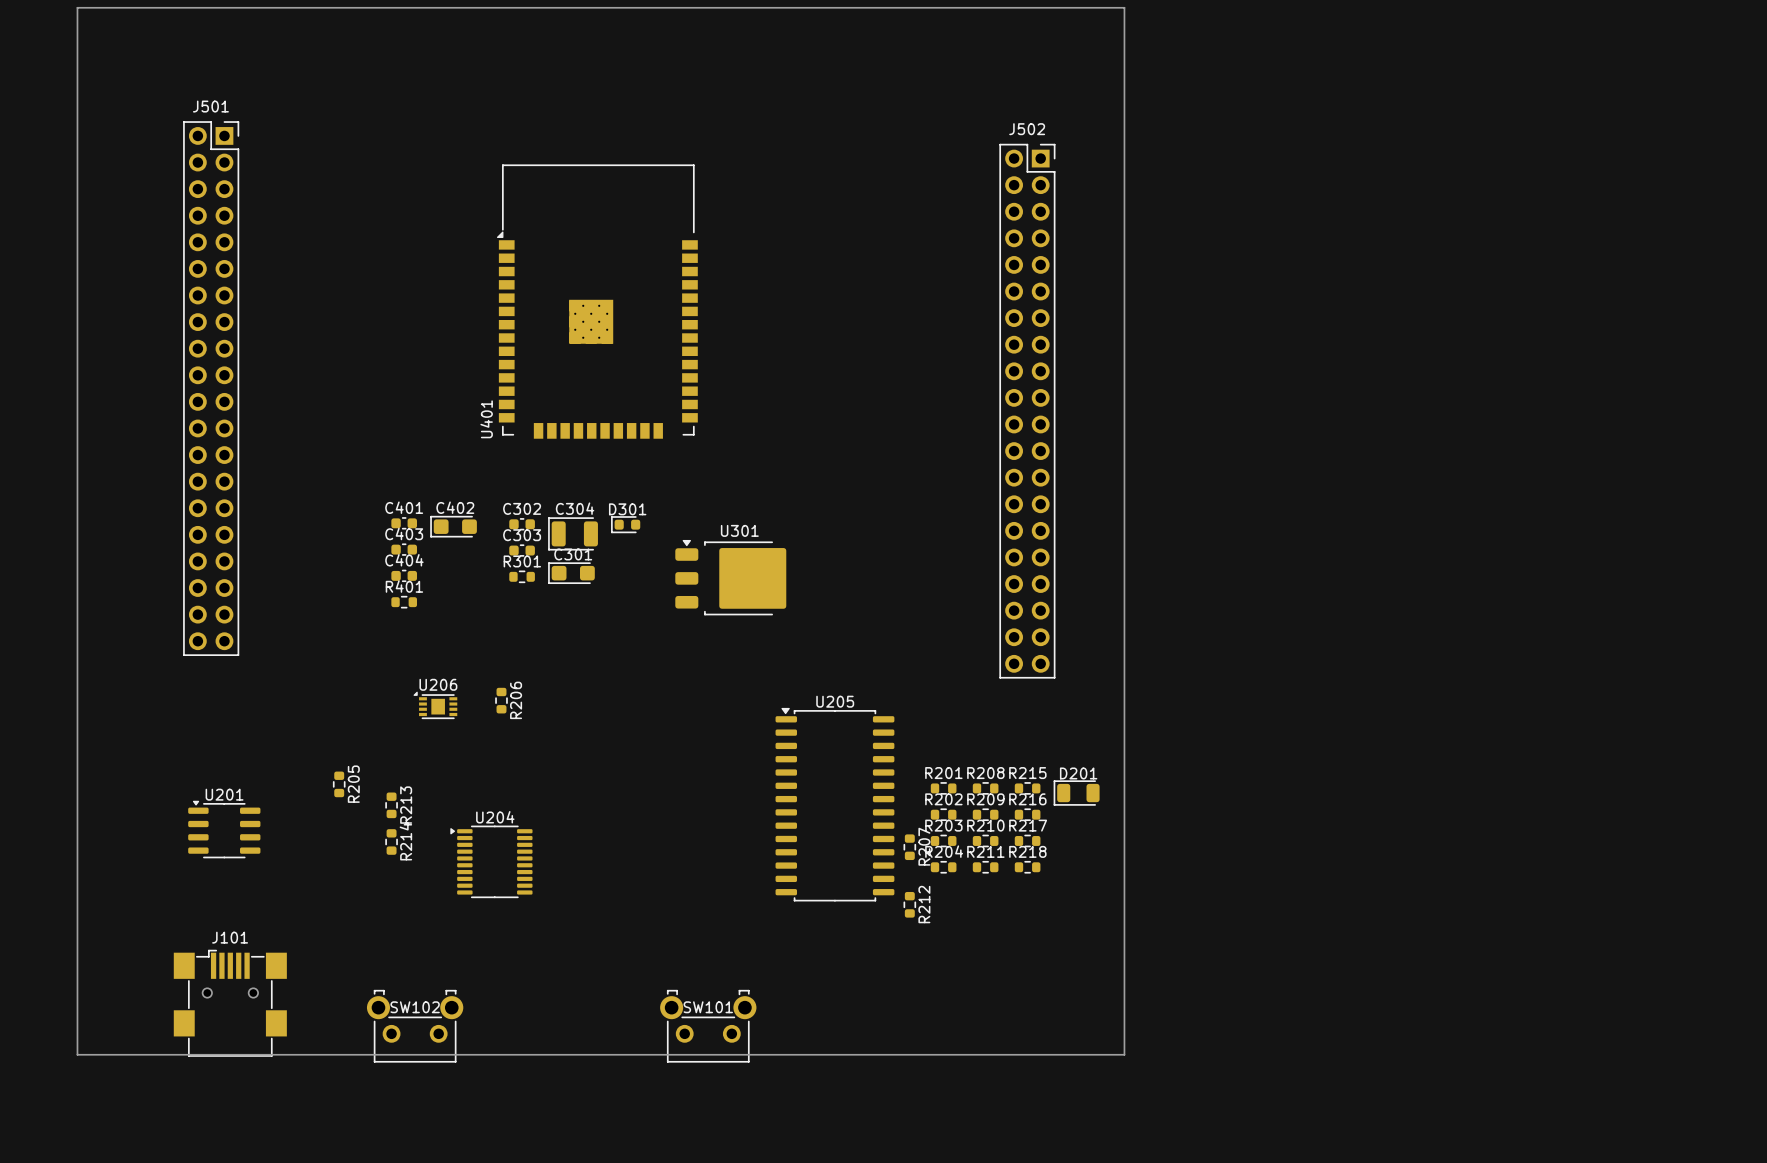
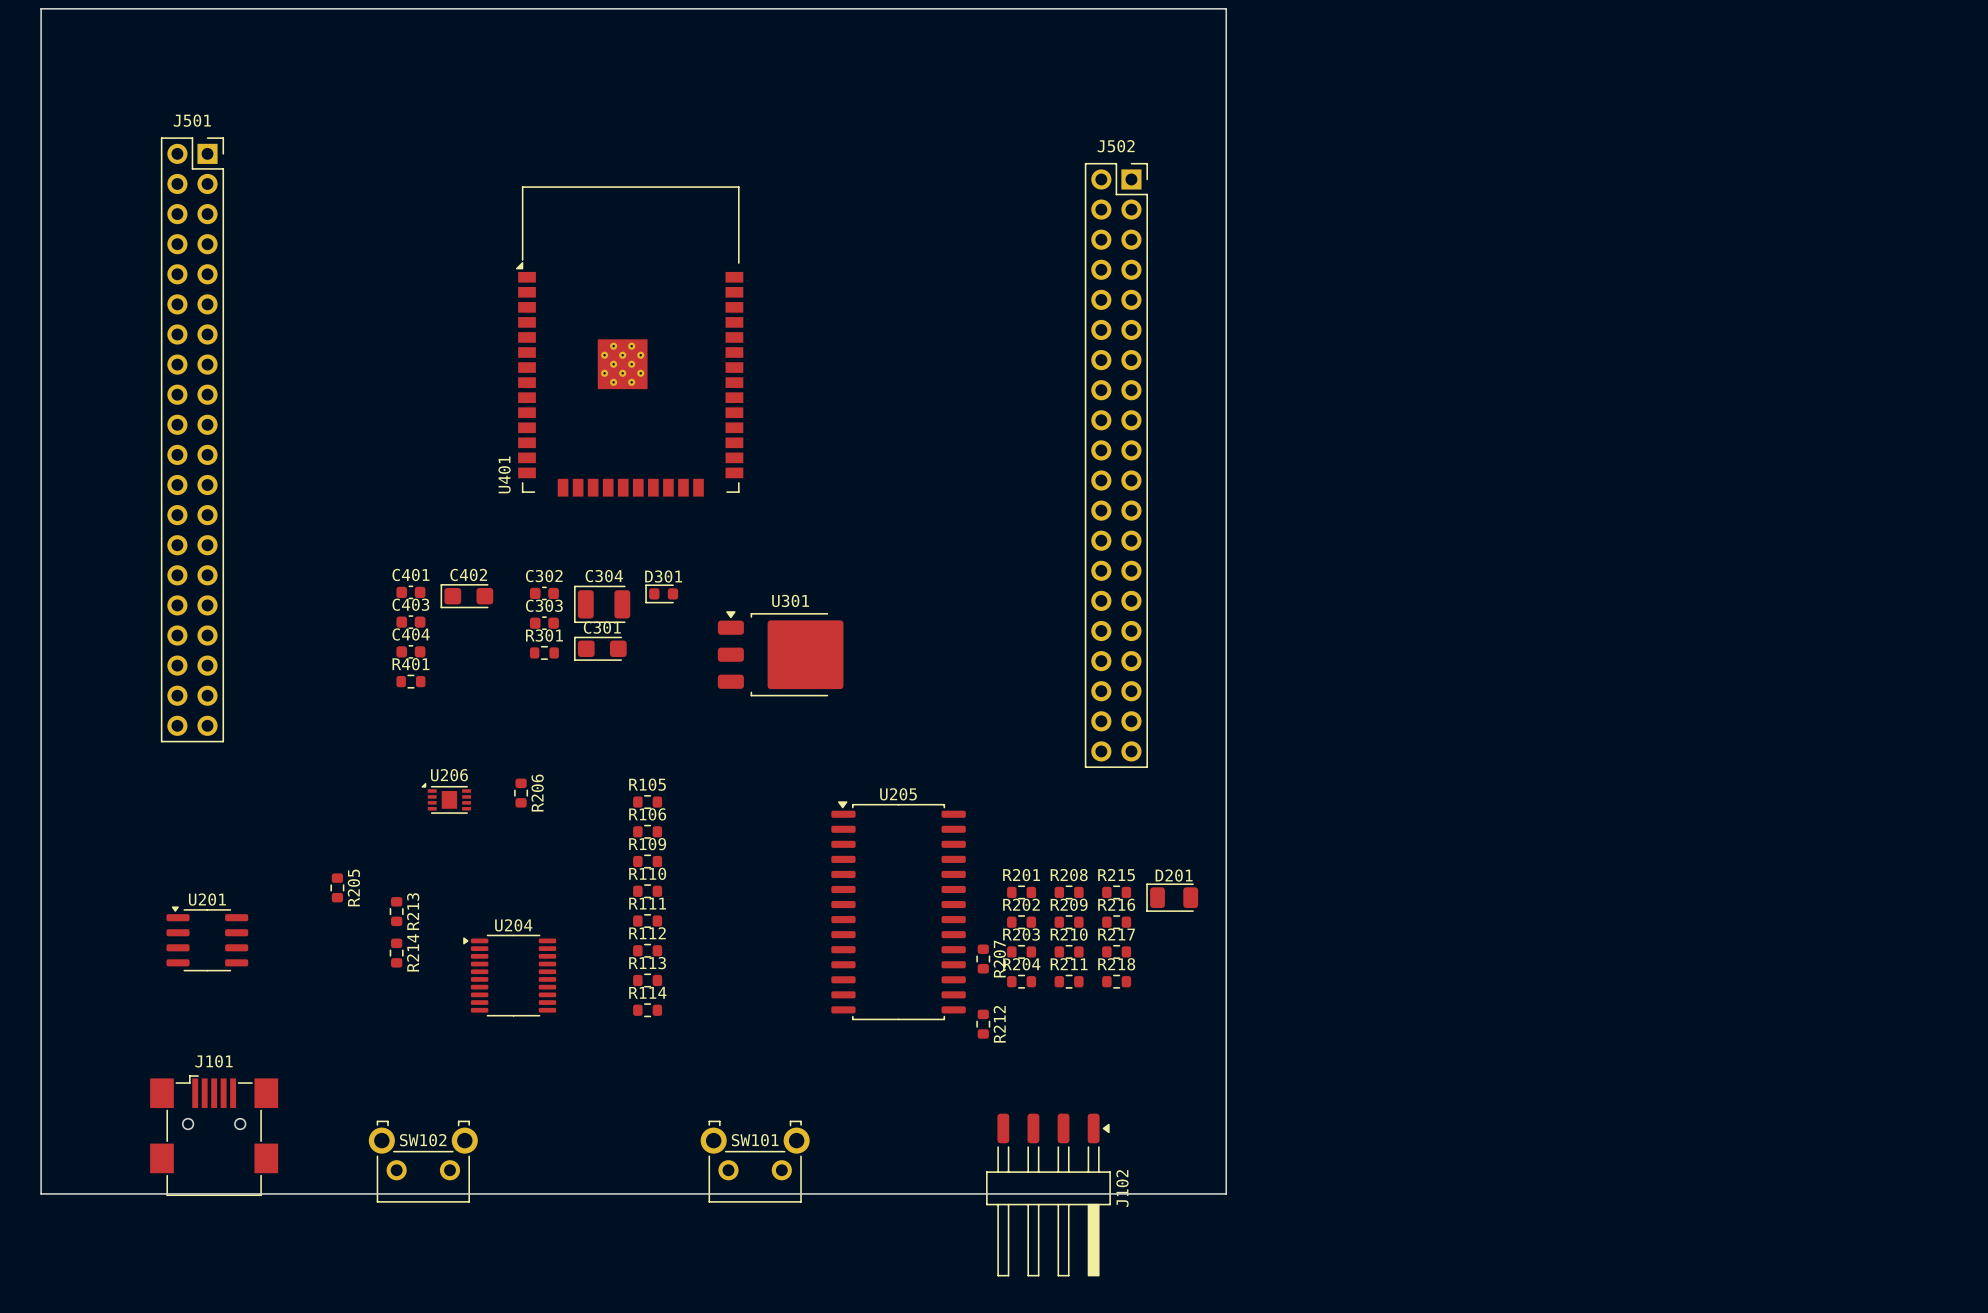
R105: none -> (647, 802)
R106: none -> (647, 831)
R109: none -> (647, 861)
R110: none -> (647, 891)
R111: none -> (647, 921)
R112: none -> (647, 950)
R113: none -> (647, 980)
R114: none -> (647, 1010)
J102: none -> (1048, 1195)

